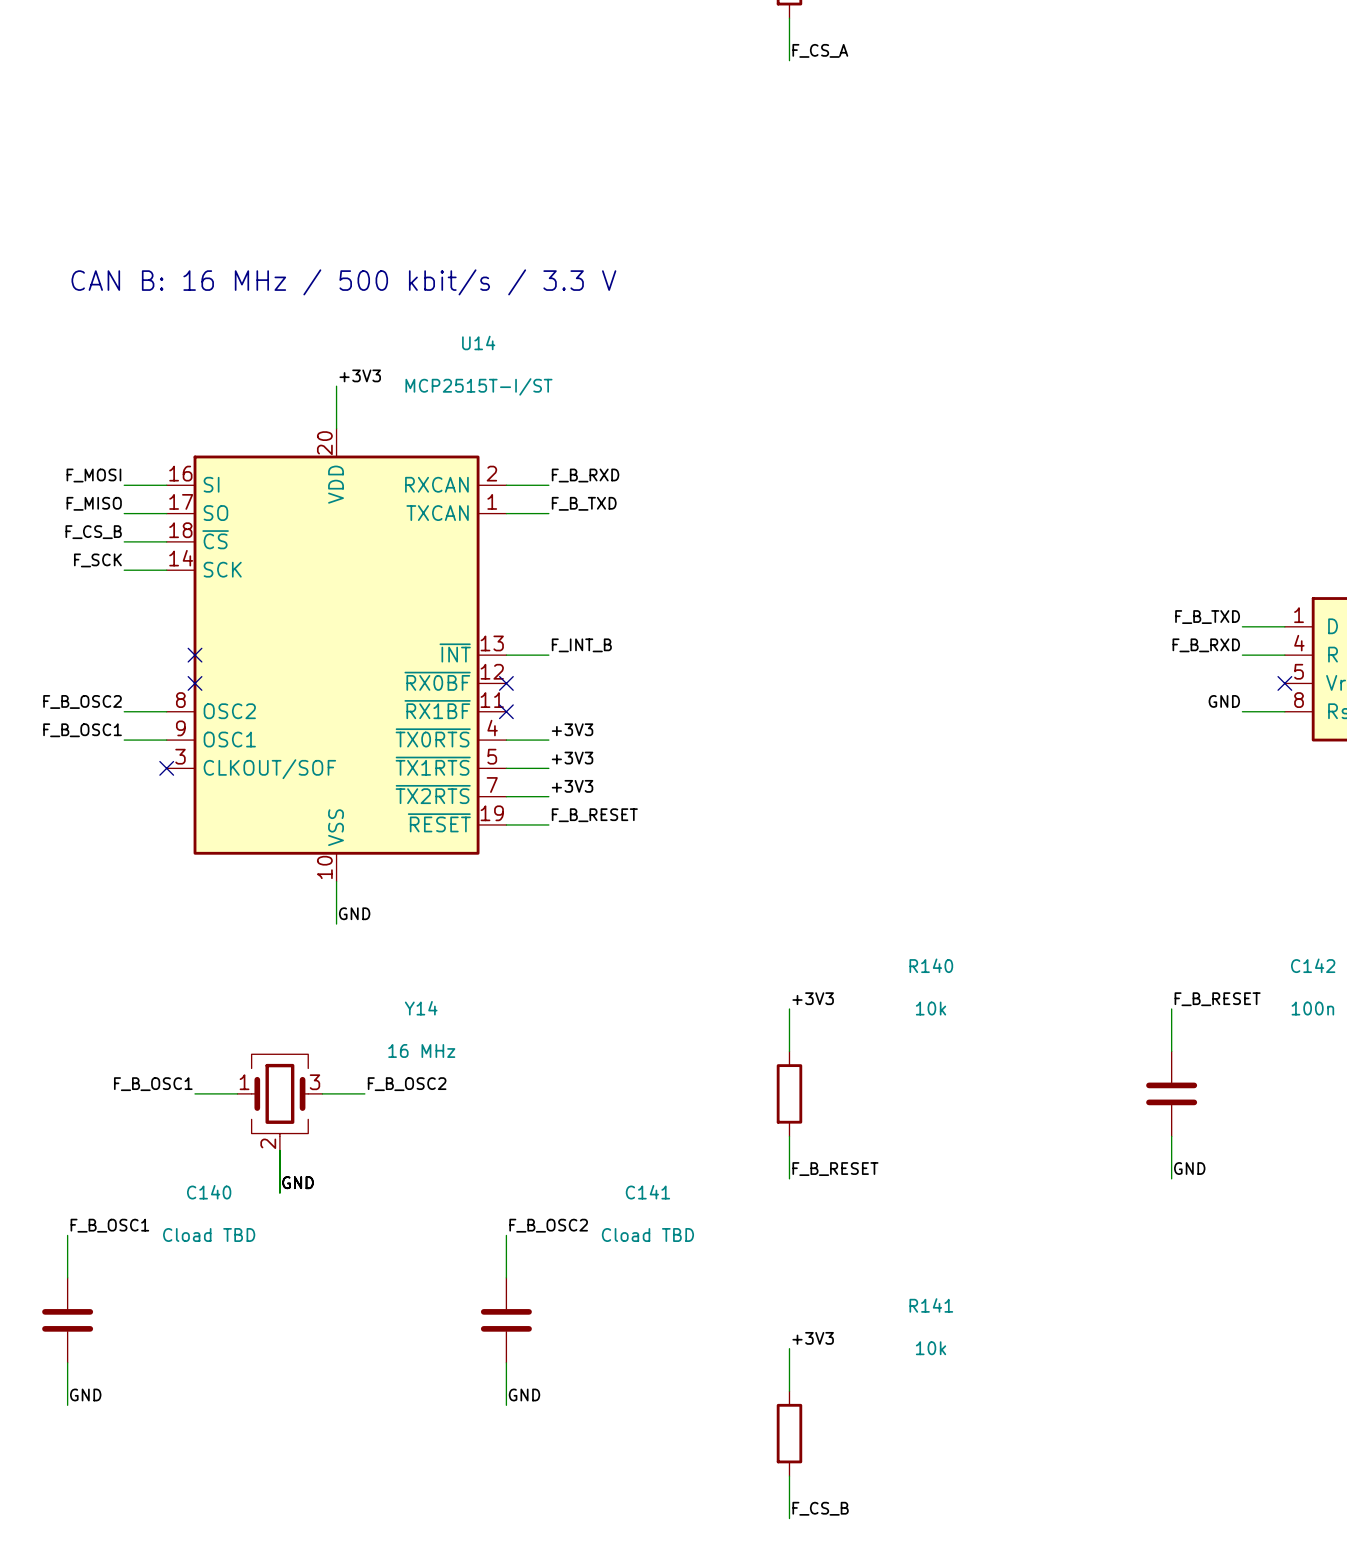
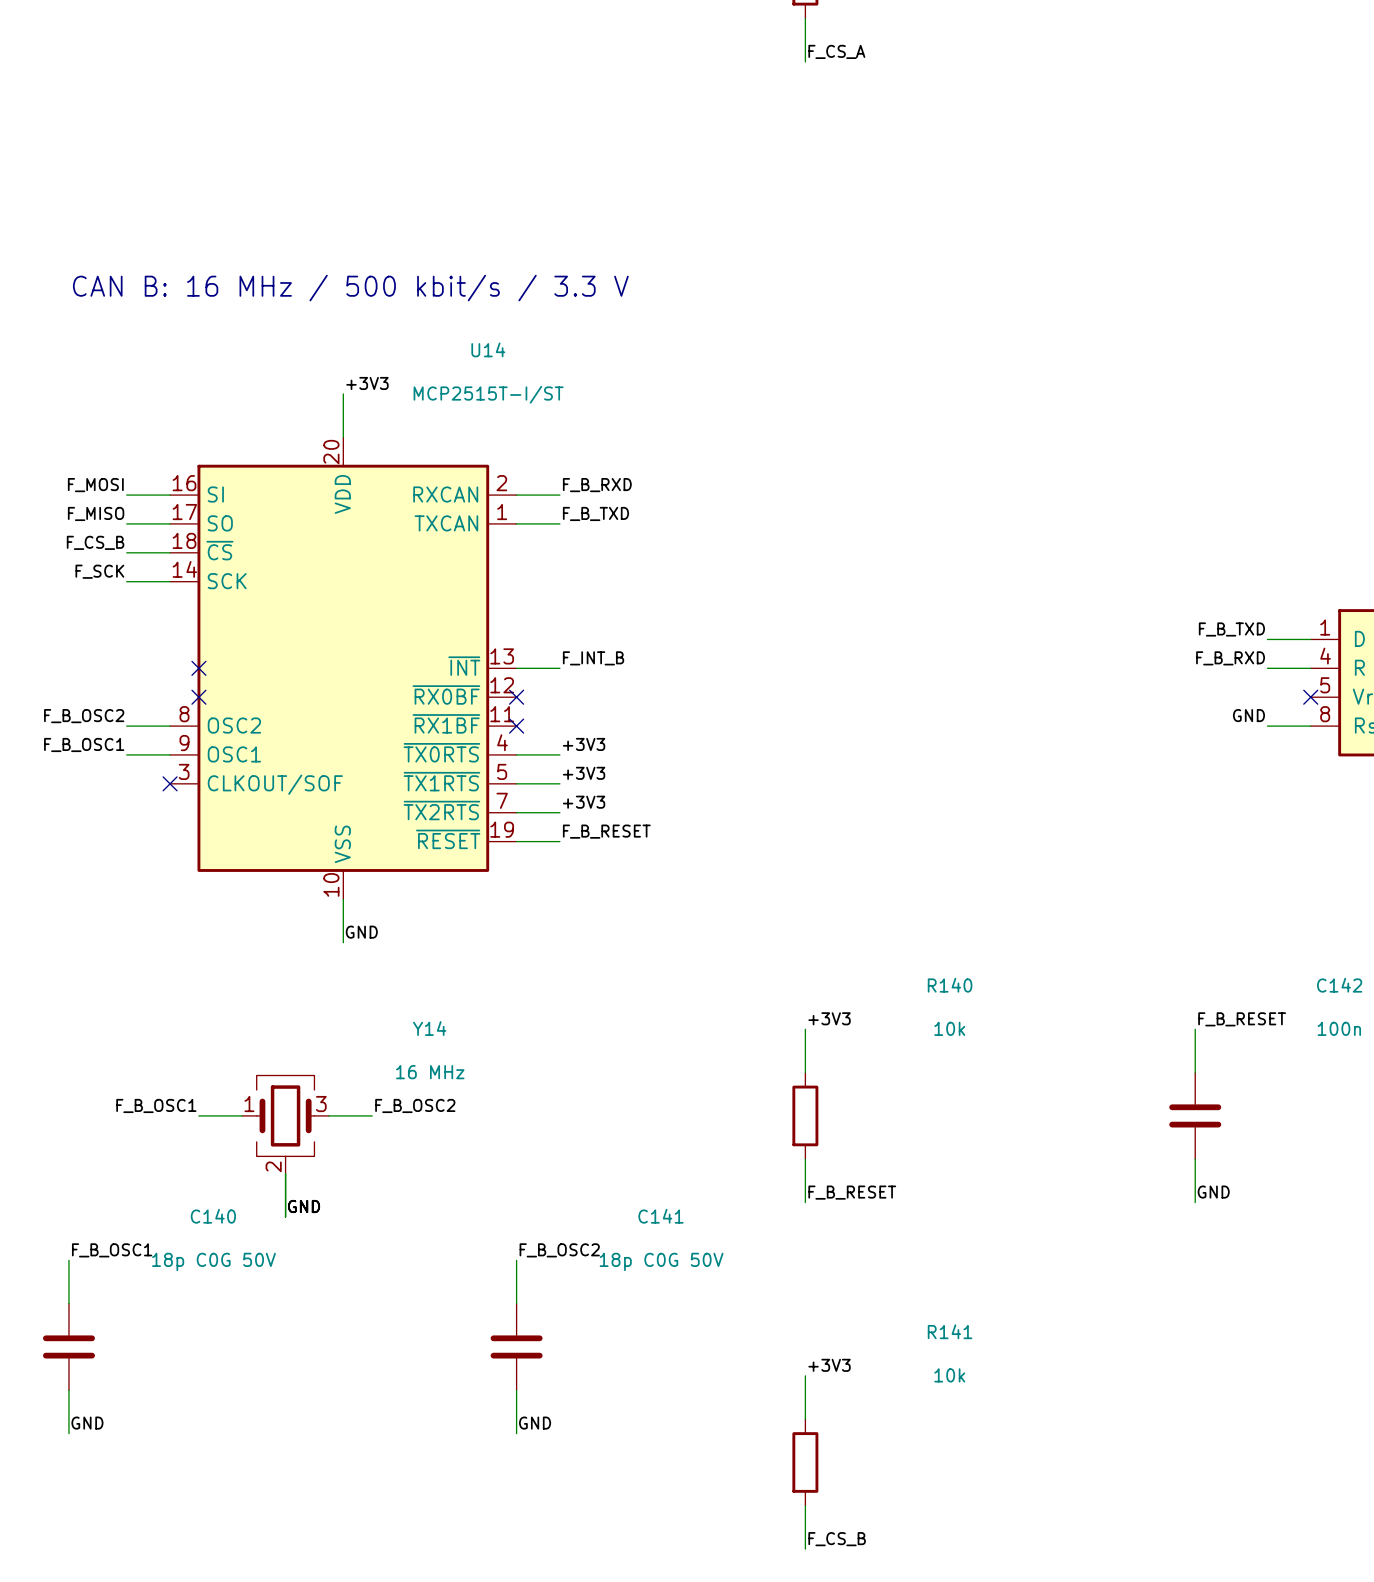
C140 value: Cload TBD (209, 1234) -> 18p C0G 50V (213, 1261)
C141 value: Cload TBD (647, 1234) -> 18p C0G 50V (661, 1261)

